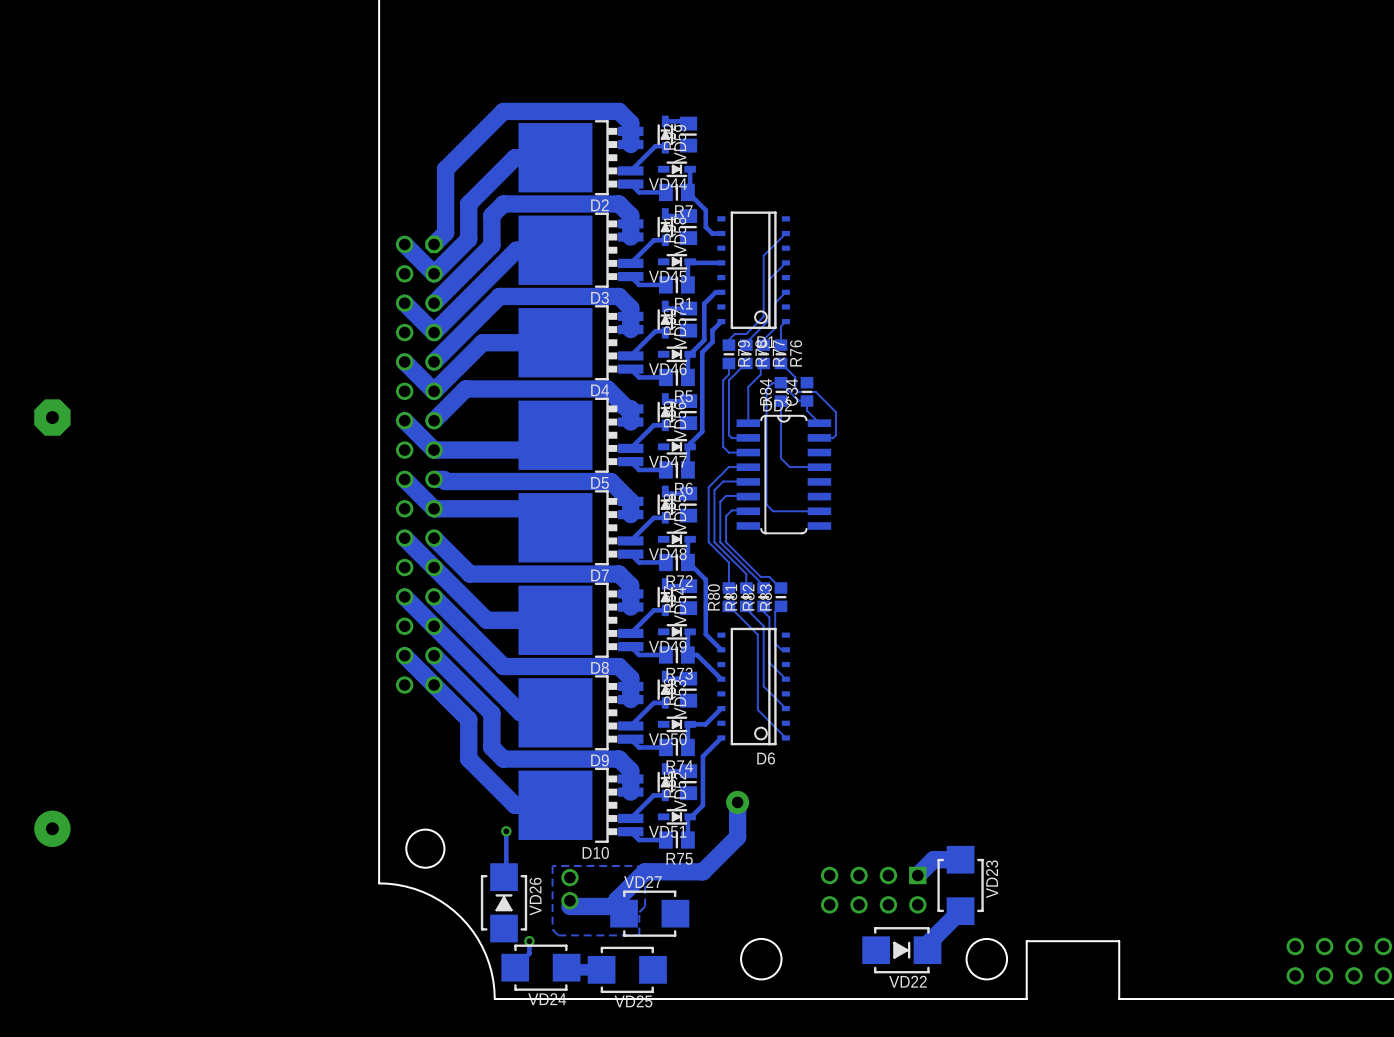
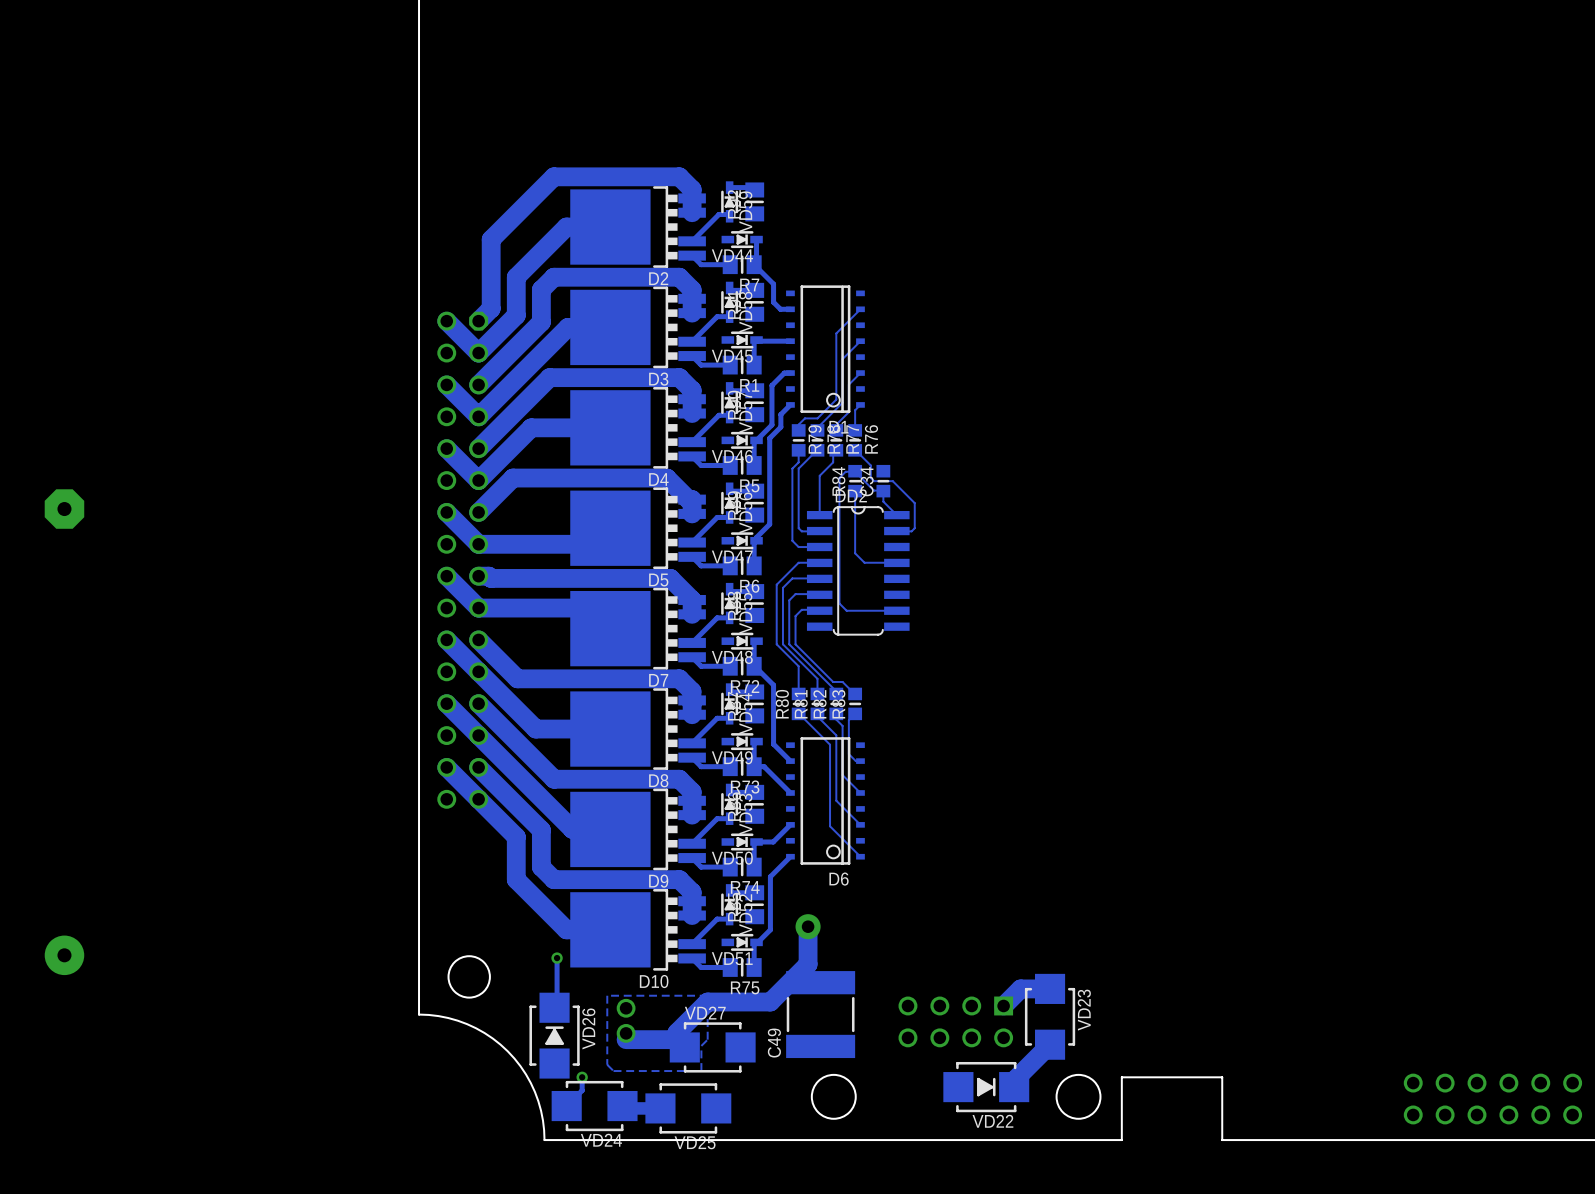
C49: none -> (820, 1014)

